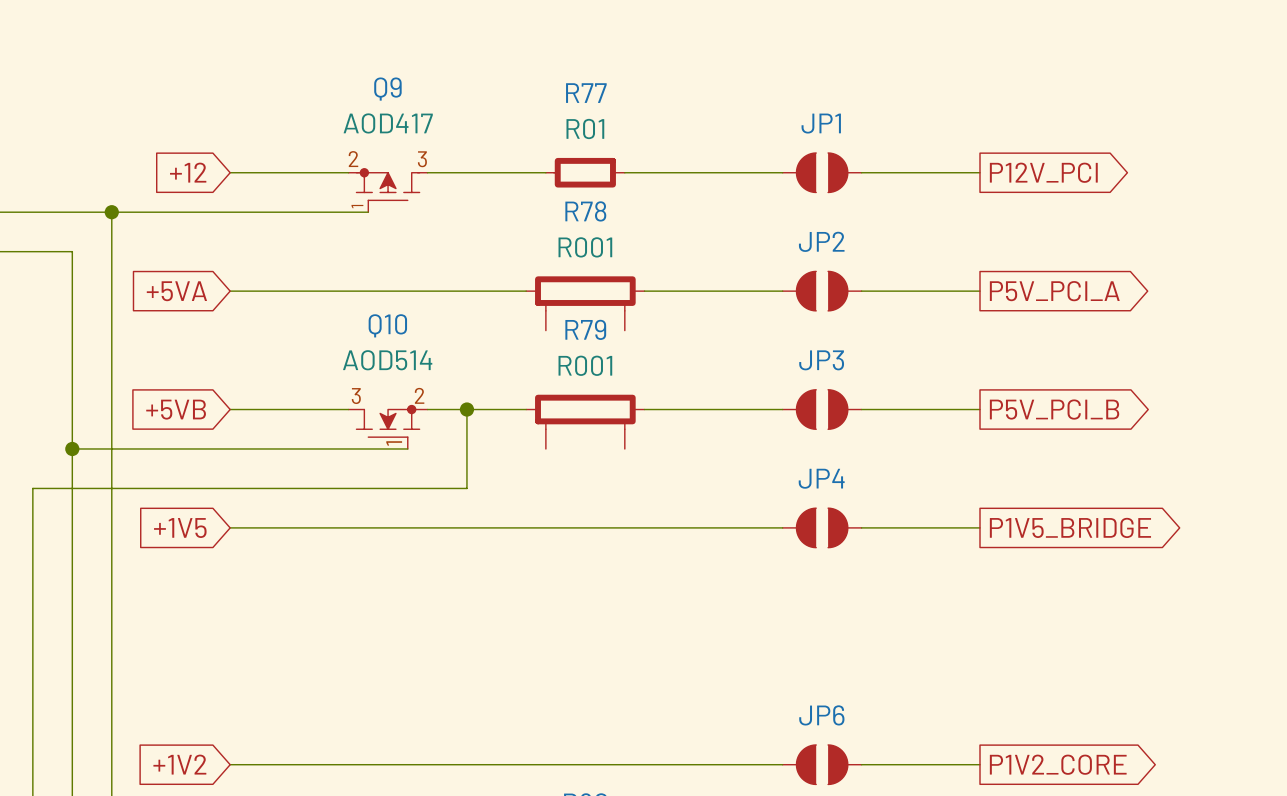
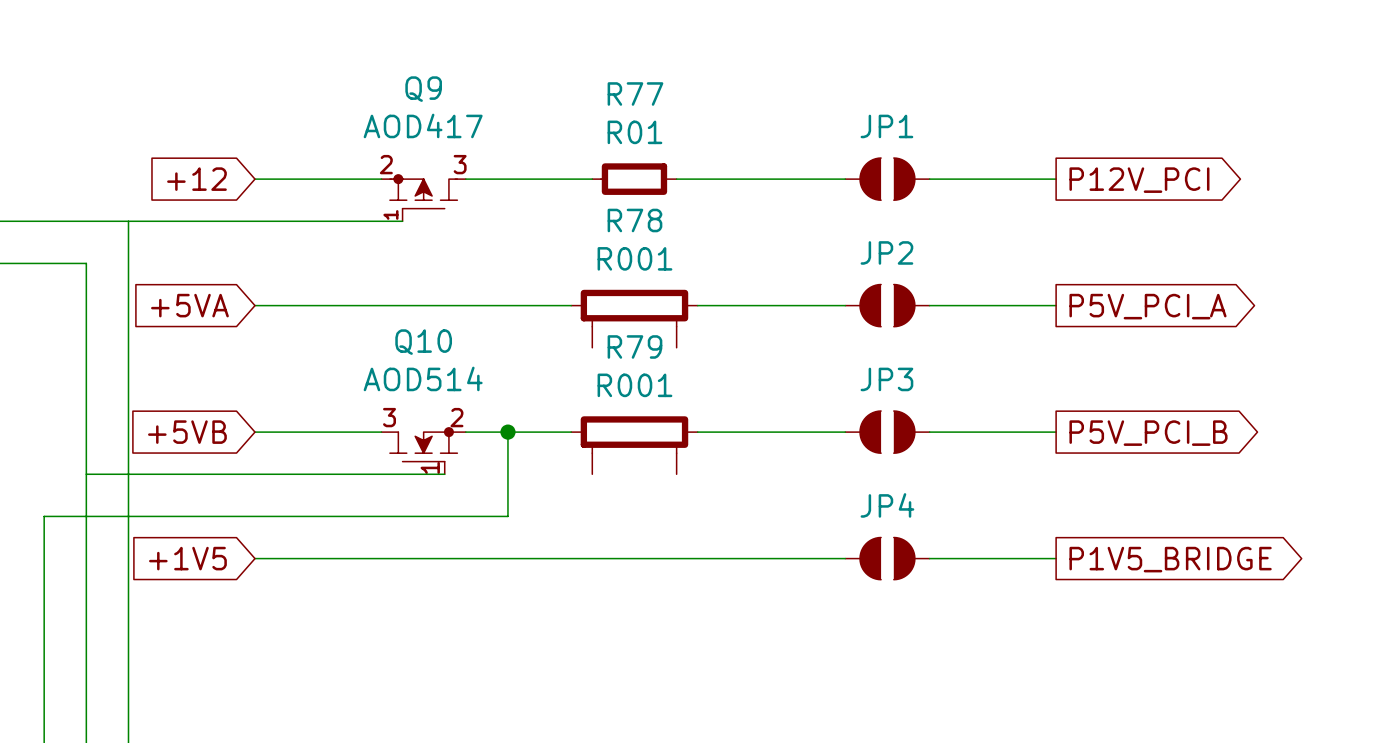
junction: (111, 212) -> none
junction: (72, 448) -> none

